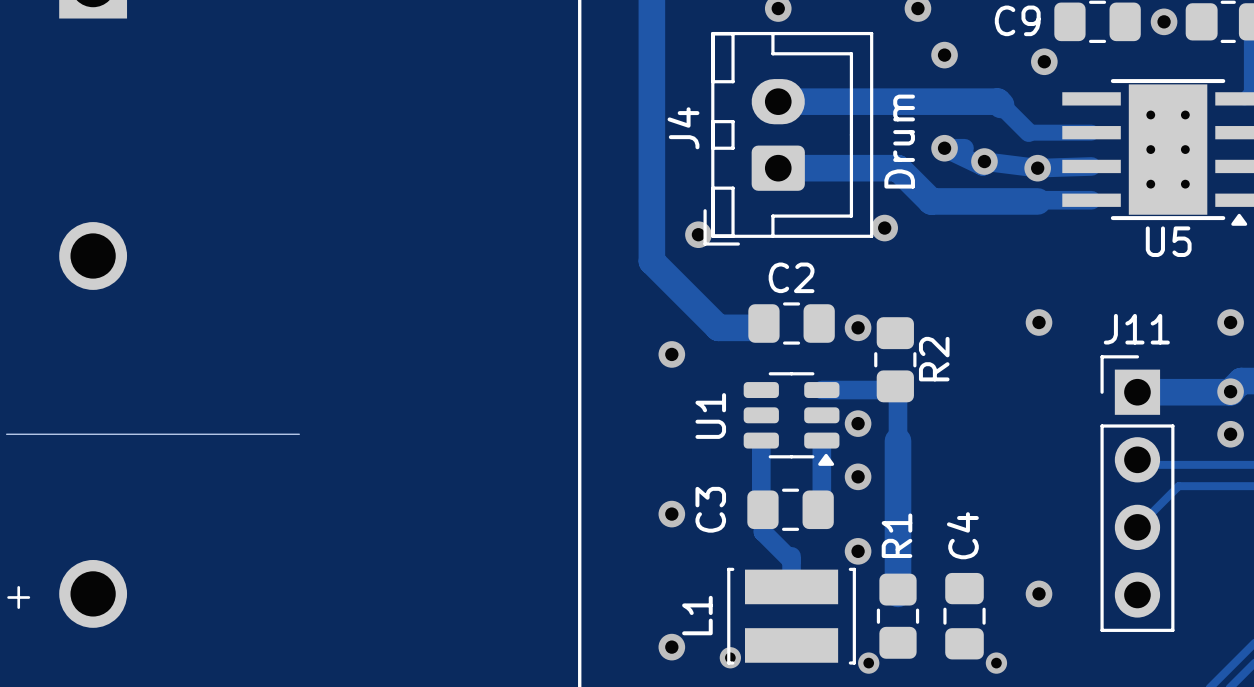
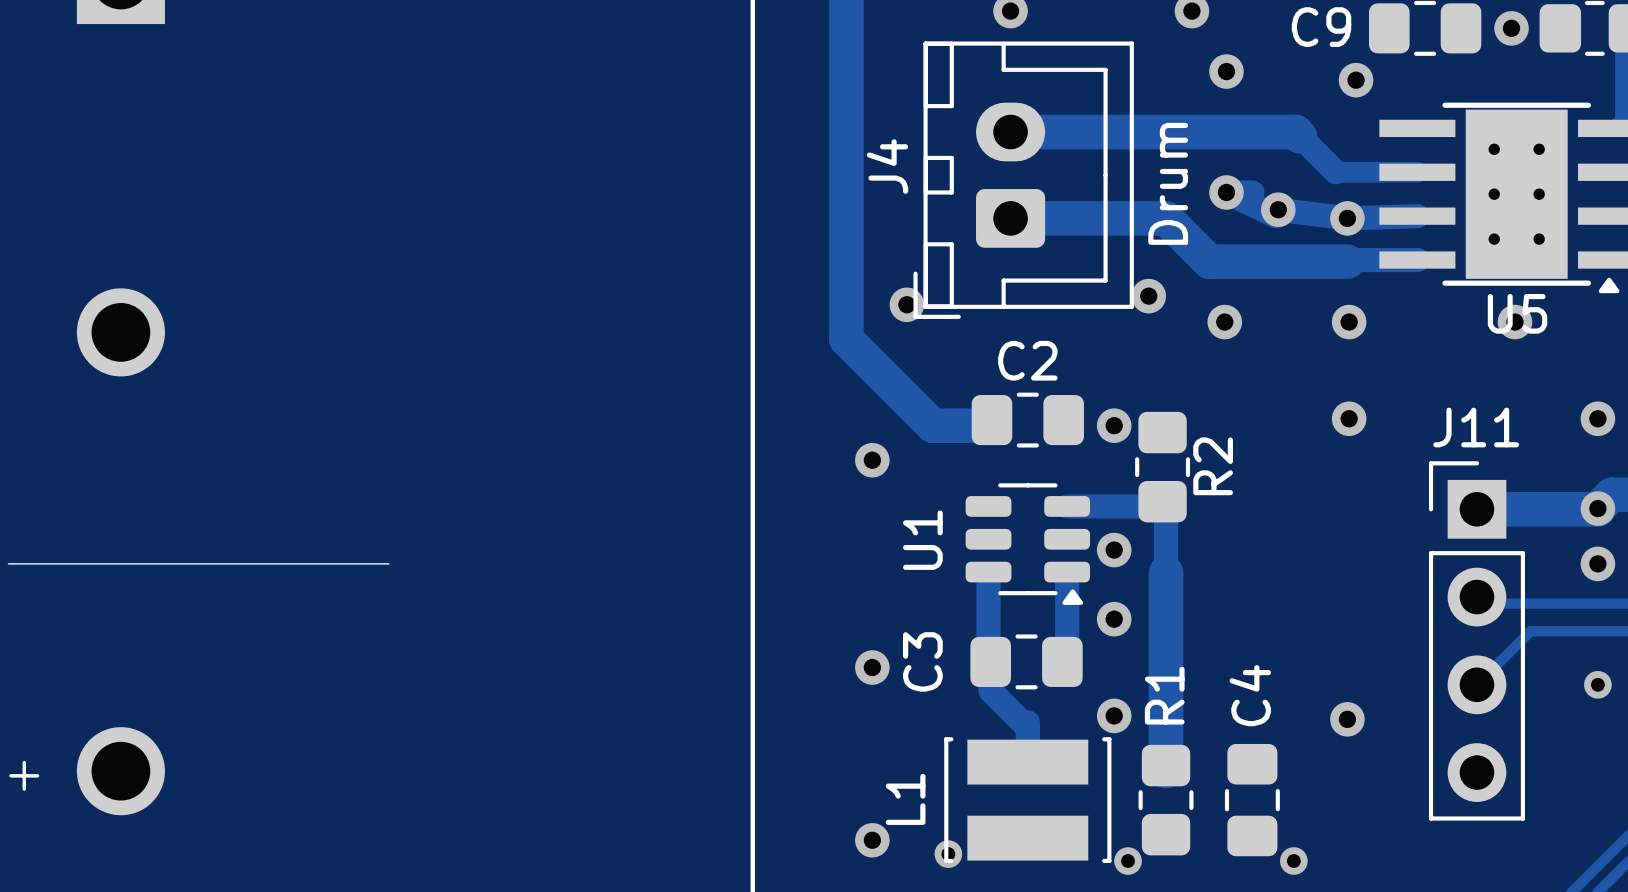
via: none -> (1224, 322)
via: none -> (1349, 322)
via: none -> (1514, 322)
via: none -> (1597, 684)
via position: (1039, 593) -> (1347, 719)

